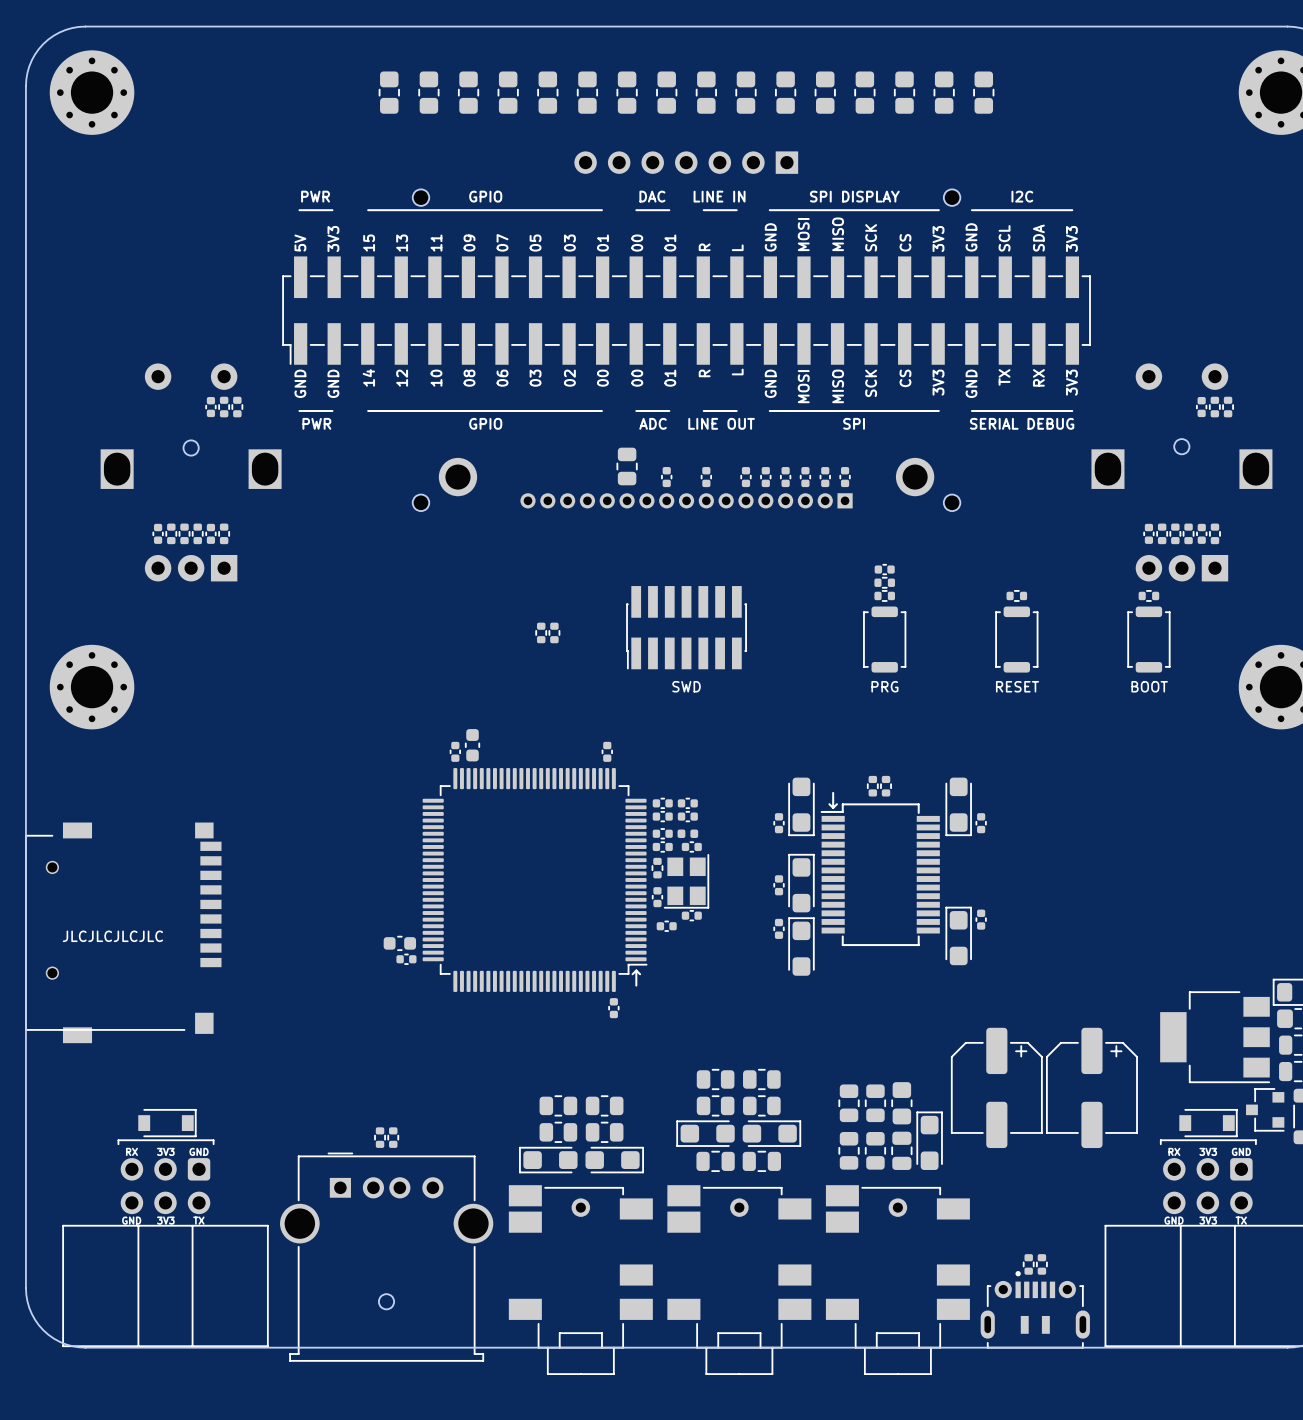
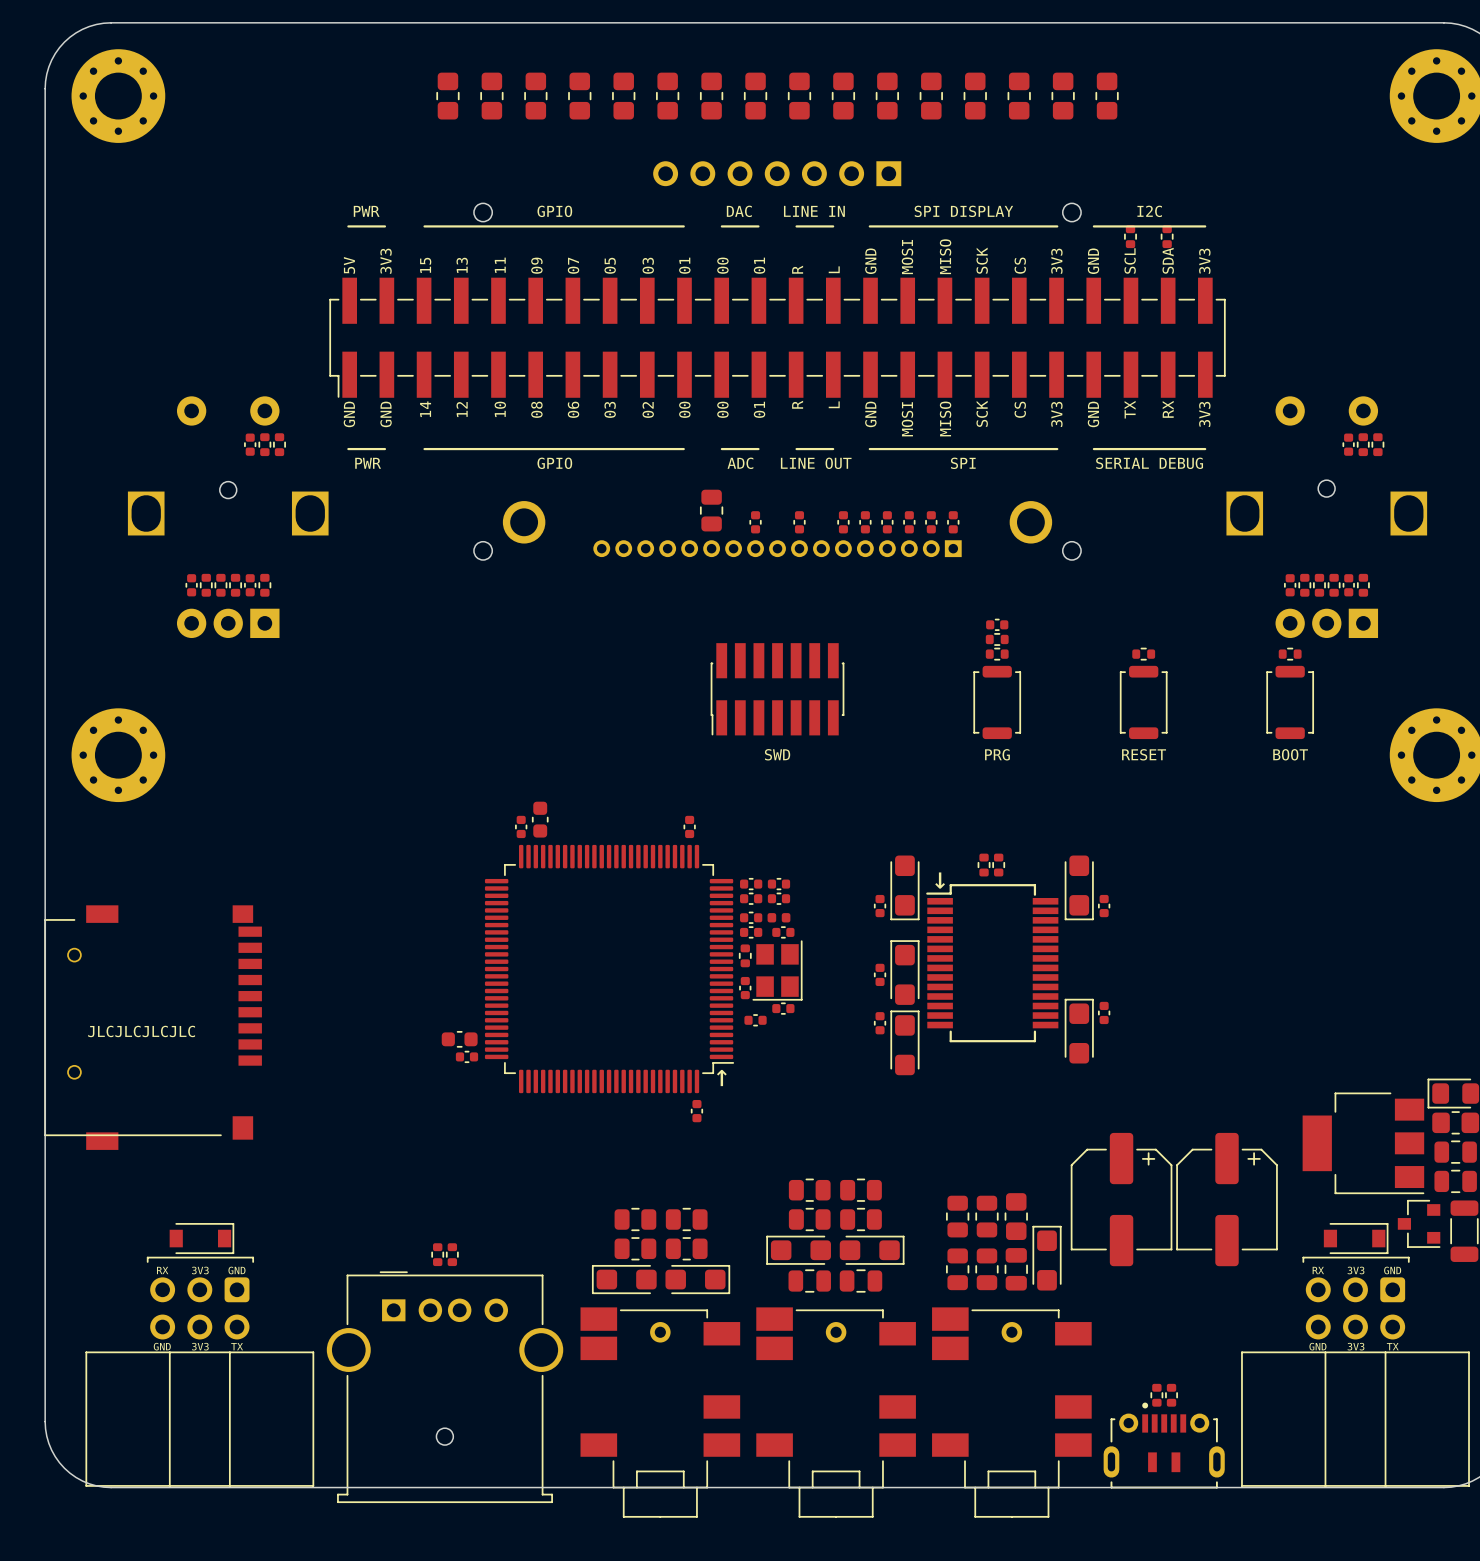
part: none -> (1130, 236)
part: none -> (1167, 236)
part: (541, 632) -> none
part: (554, 632) -> none

